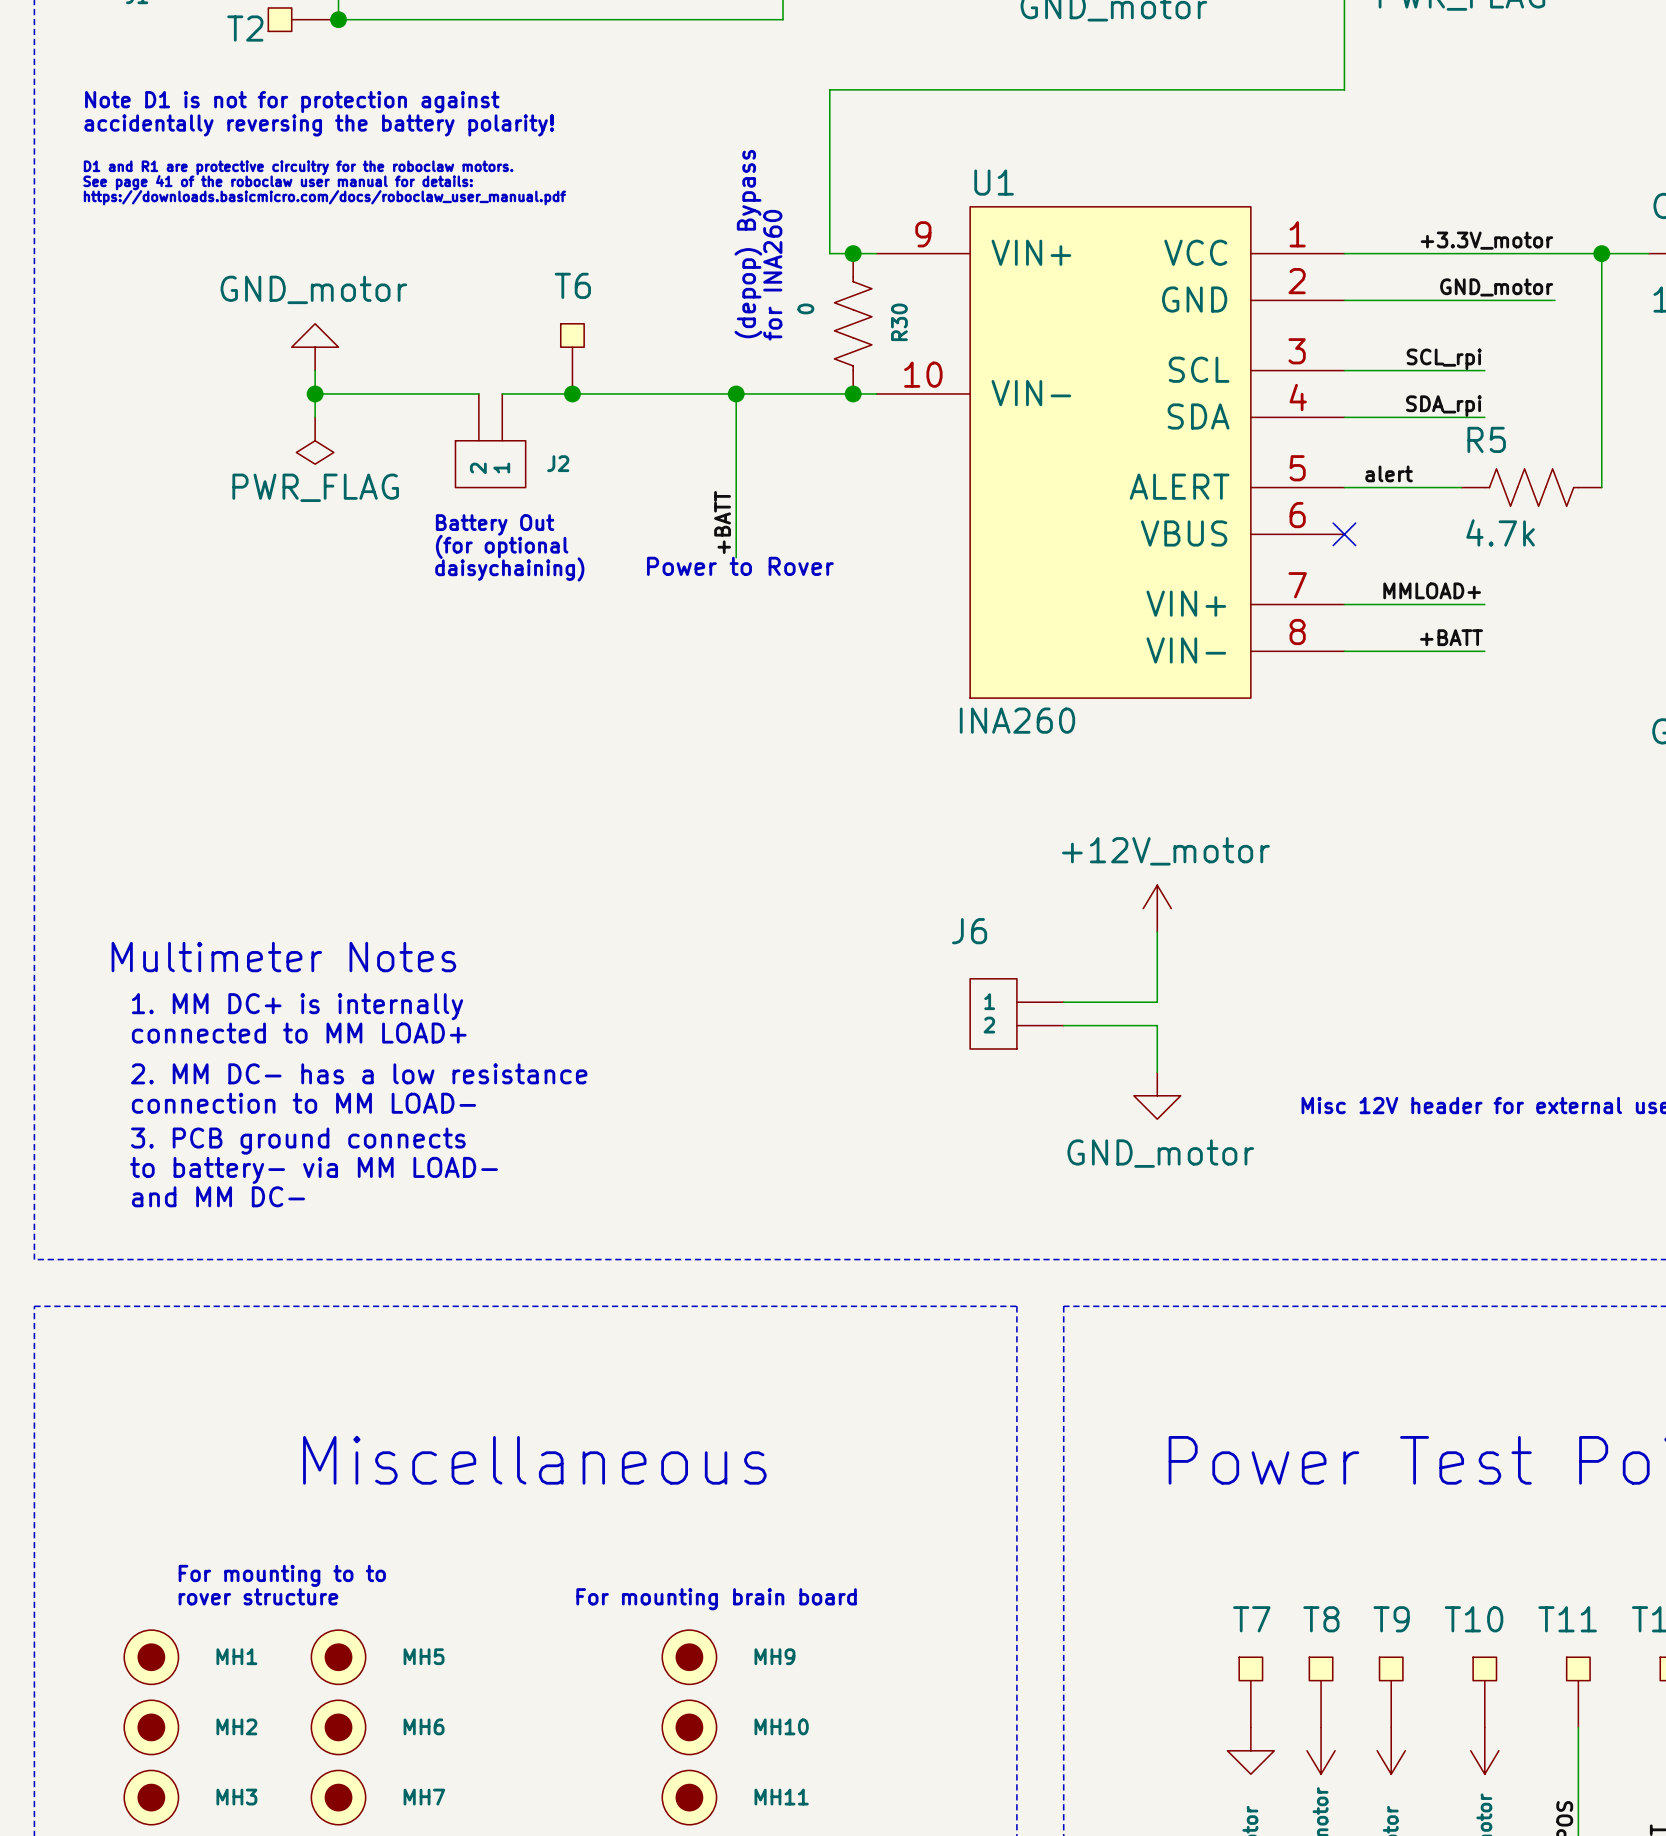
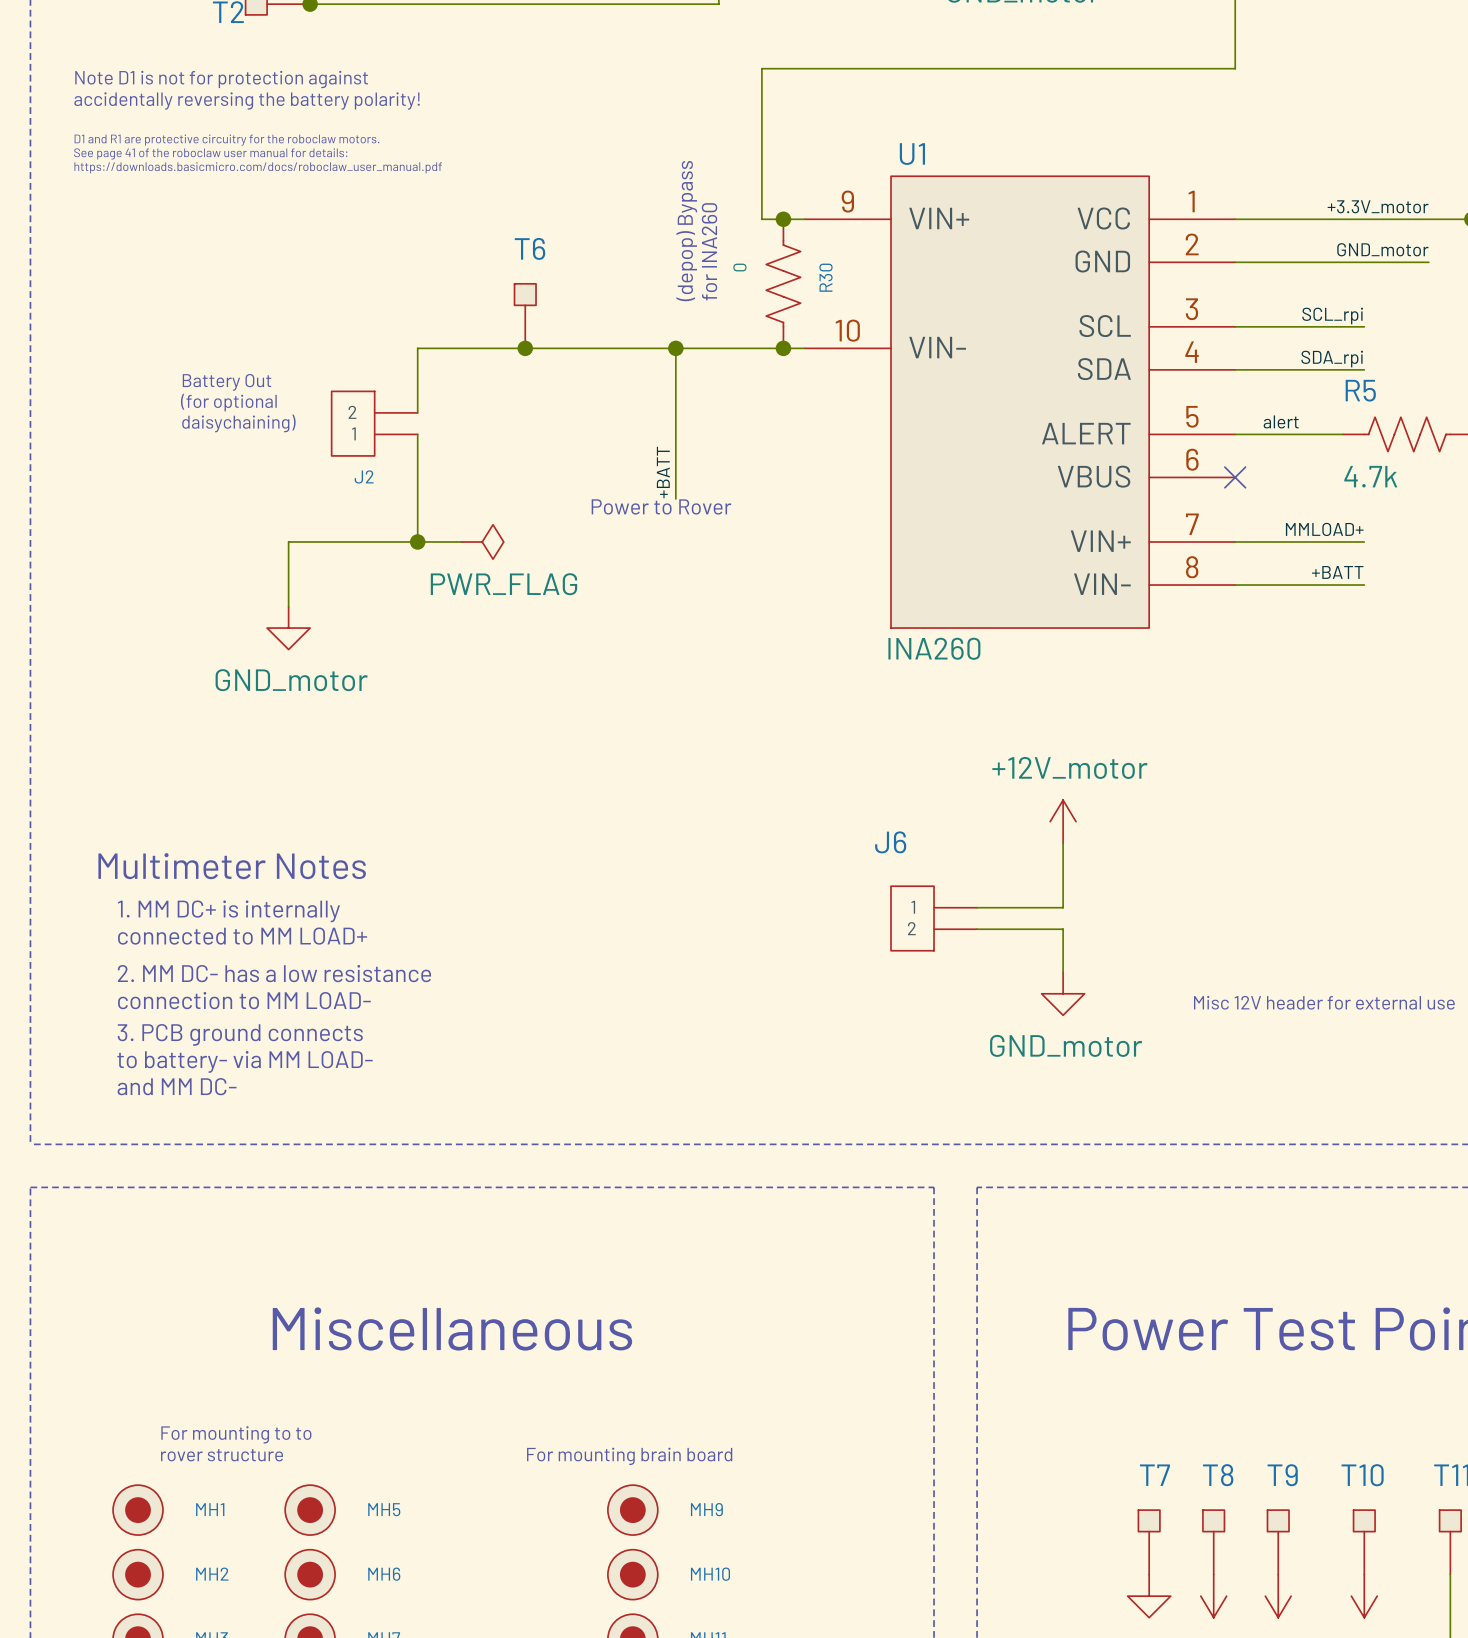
power symbol rotation: 0° (315, 347) -> 180° (288, 628)
power symbol position: GND_motor (315, 347) -> GND_motor (288, 628)
wire: (315, 370) (315, 417) -> none
wire: (315, 393) (455, 393) -> (417, 412) (417, 348)
junction: (315, 393) -> none
wire: none -> (439, 348) (460, 348)
power symbol rotation: 0° (315, 440) -> 90° counterclockwise (482, 541)
power symbol position: PWR_FLAG (315, 440) -> PWR_FLAG (482, 541)
J2 position: (490, 440) -> (374, 423)
J2 rotation: 0° (490, 464) -> 90° clockwise (353, 423)
wire: none -> (417, 434) (417, 541)
text position: Battery Out (495, 524) -> Battery Out (226, 382)
text position: (for optional (502, 546) -> (for optional (228, 402)
text position: daisychaining) (509, 569) -> daisychaining) (238, 423)
junction: none -> (417, 541)
wire: none -> (460, 541) (288, 541) (288, 606)

